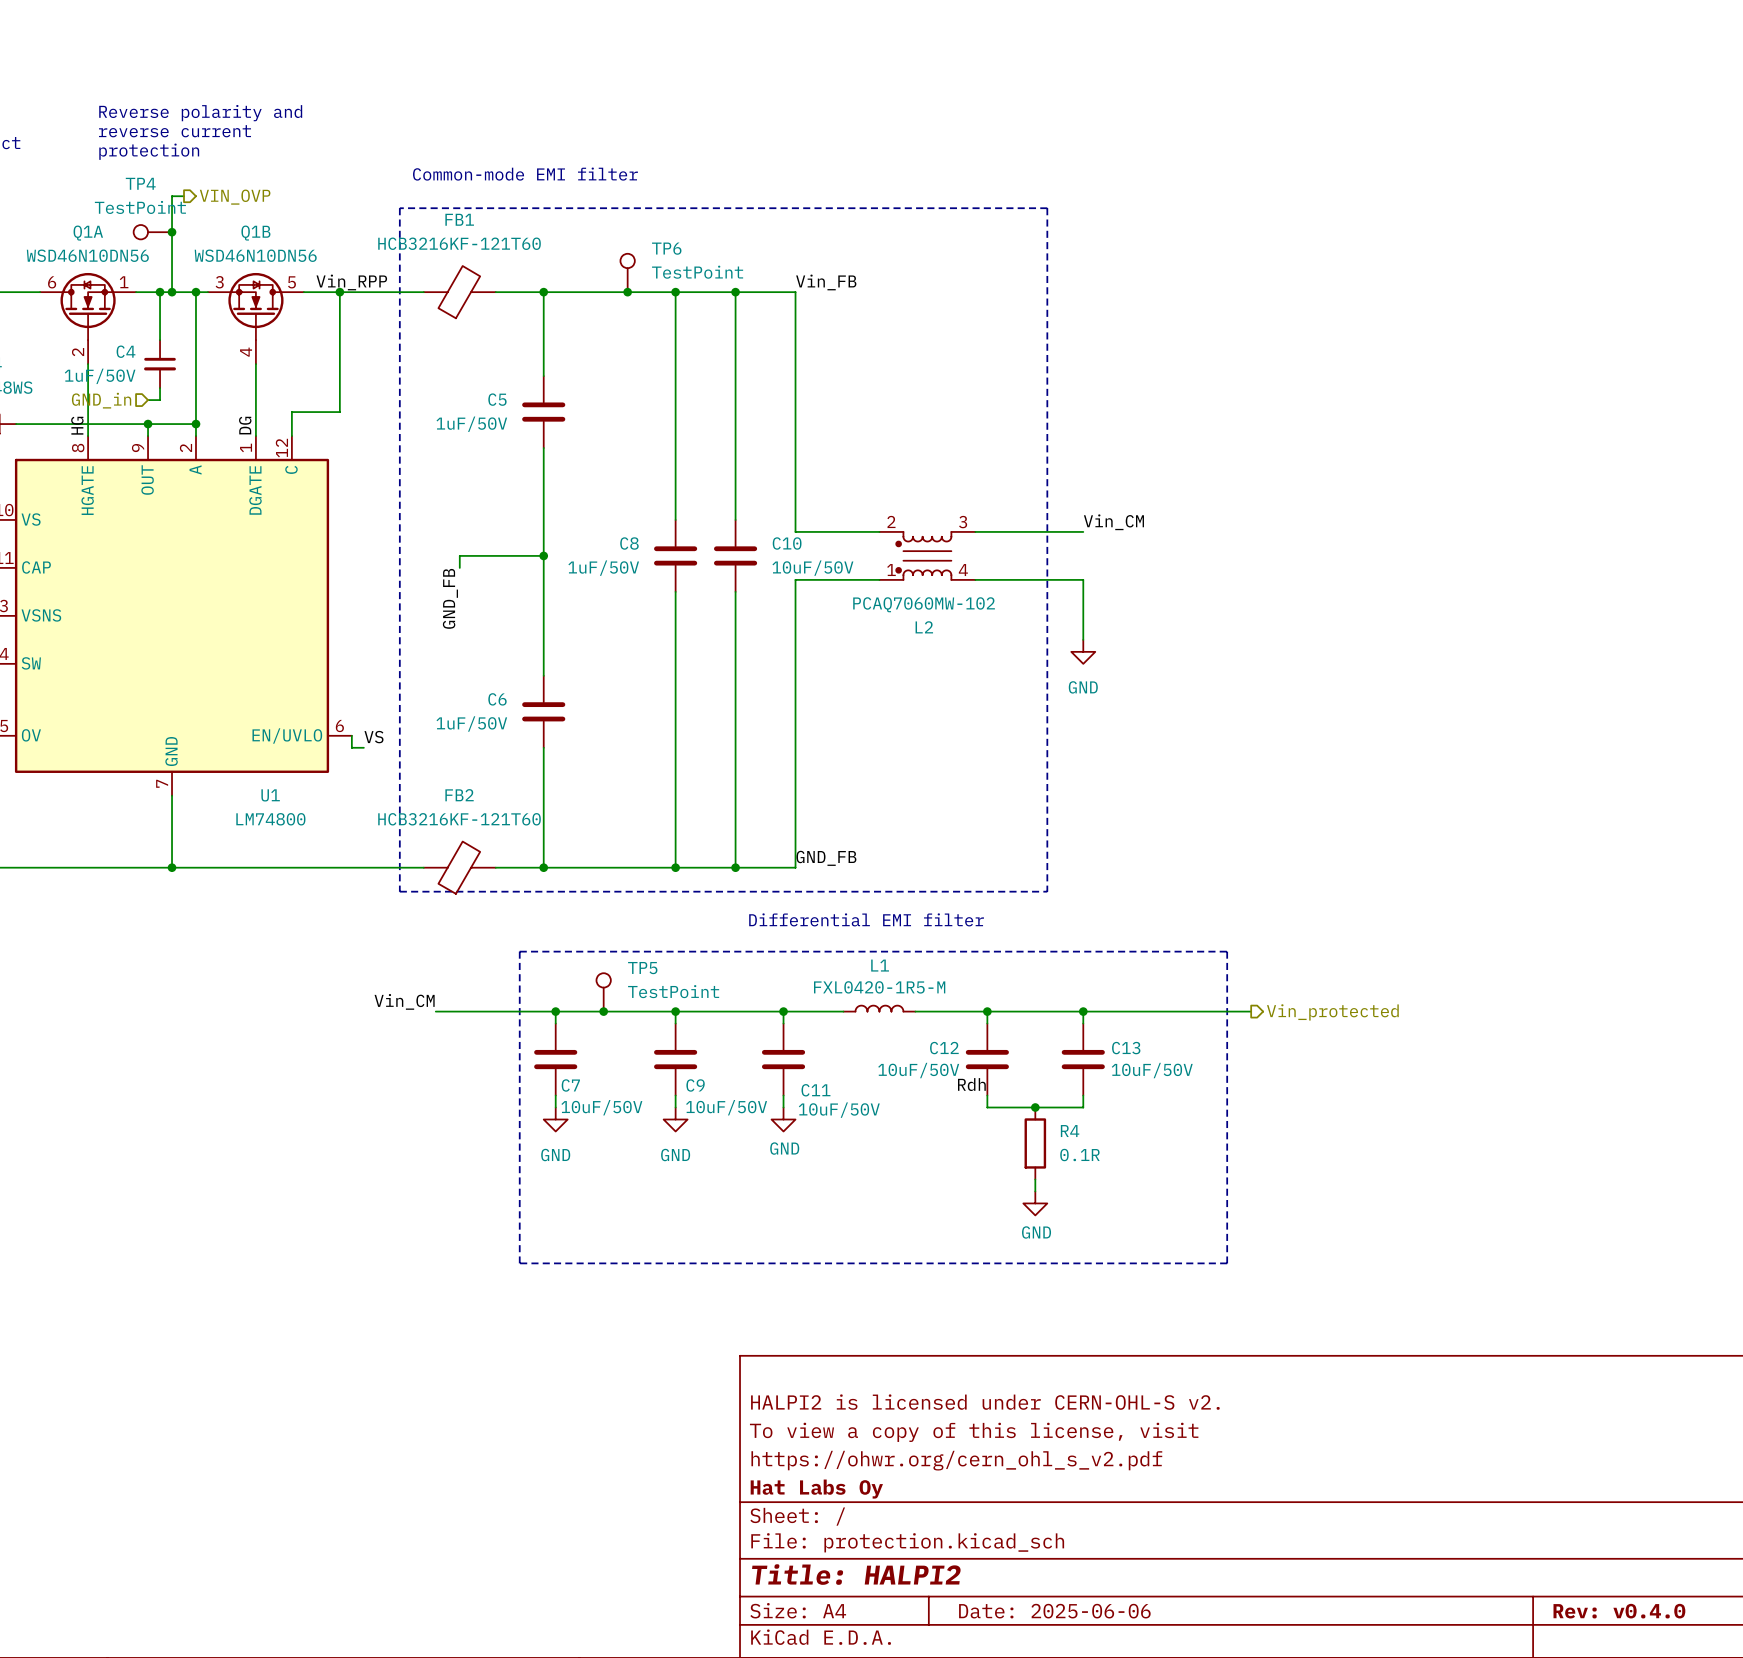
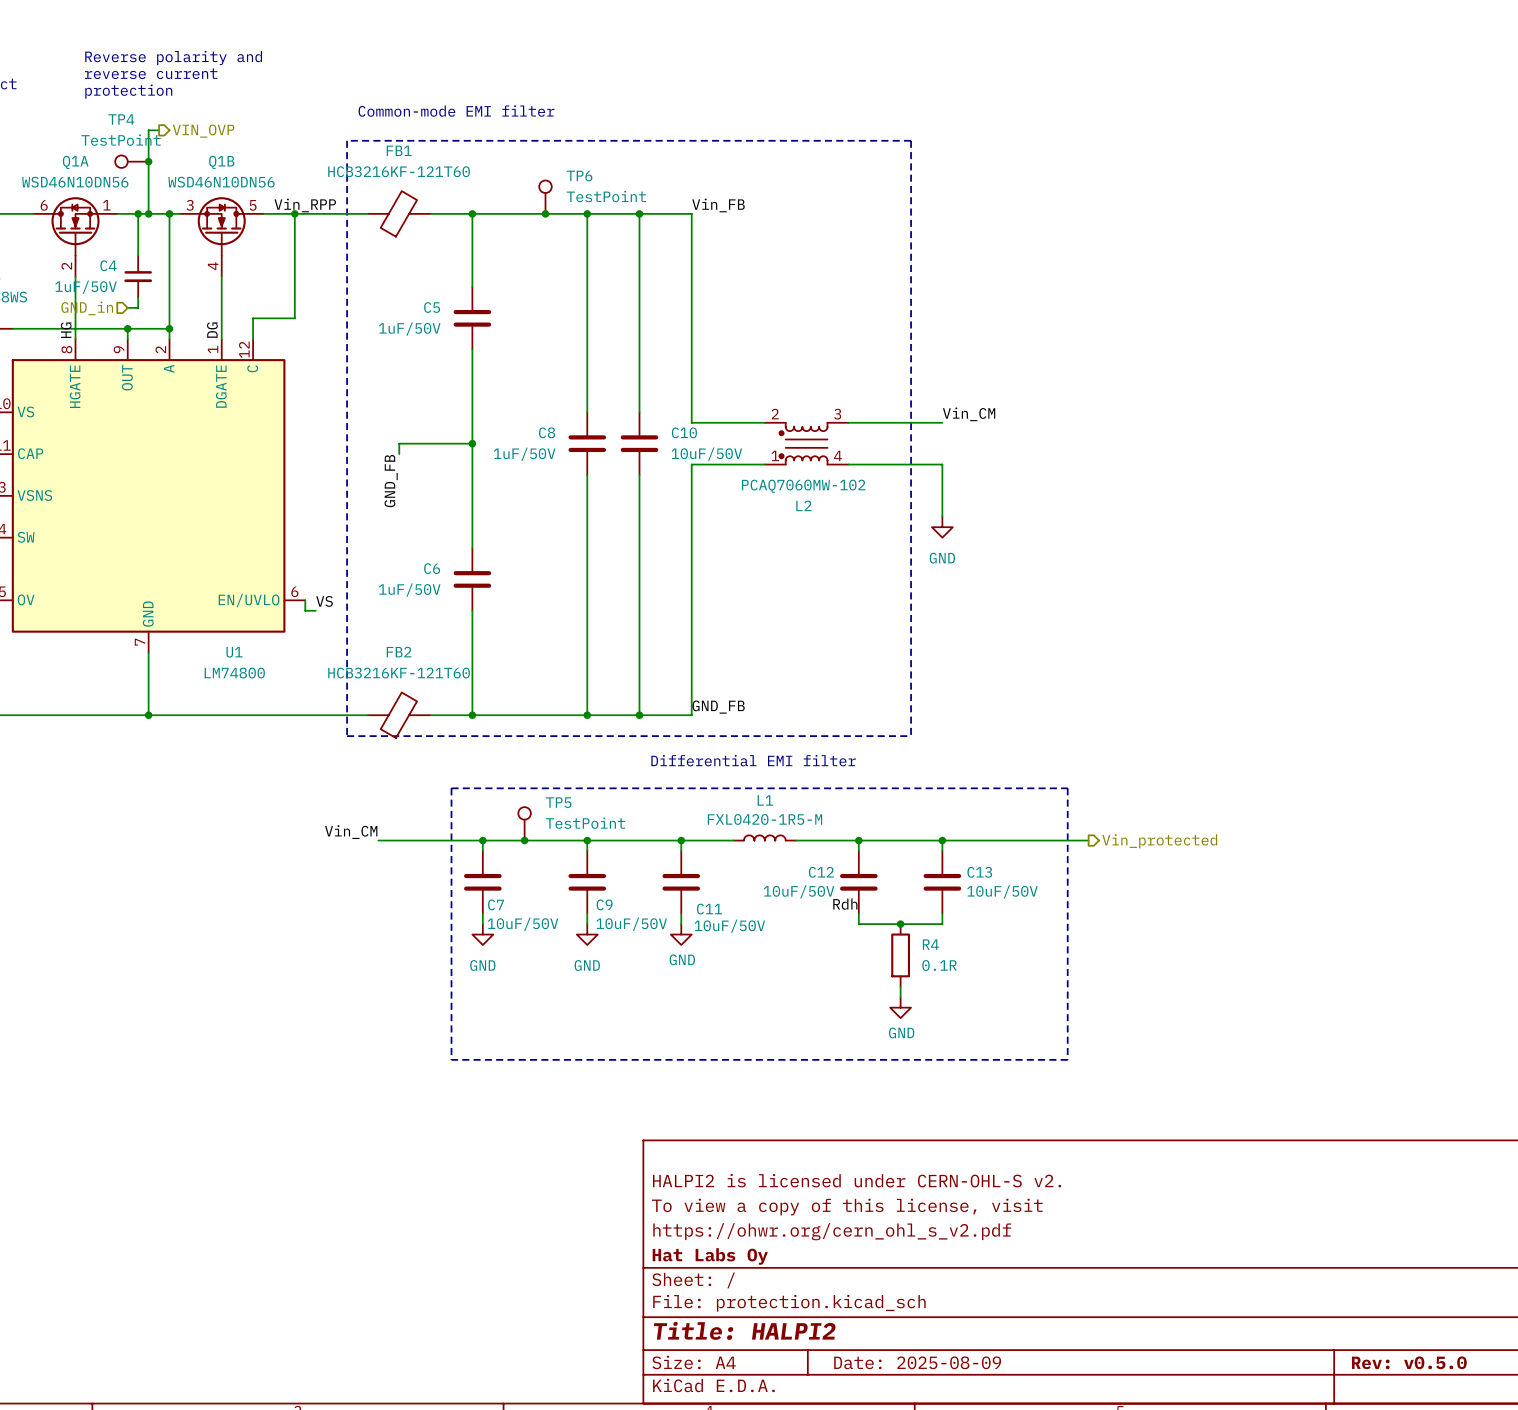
title block: Date: 2025-06-06 (1054, 1611) -> Date: 2025-08-09 (917, 1362)
title block: Rev: v0.4.0 (1619, 1611) -> Rev: v0.5.0 (1409, 1362)

